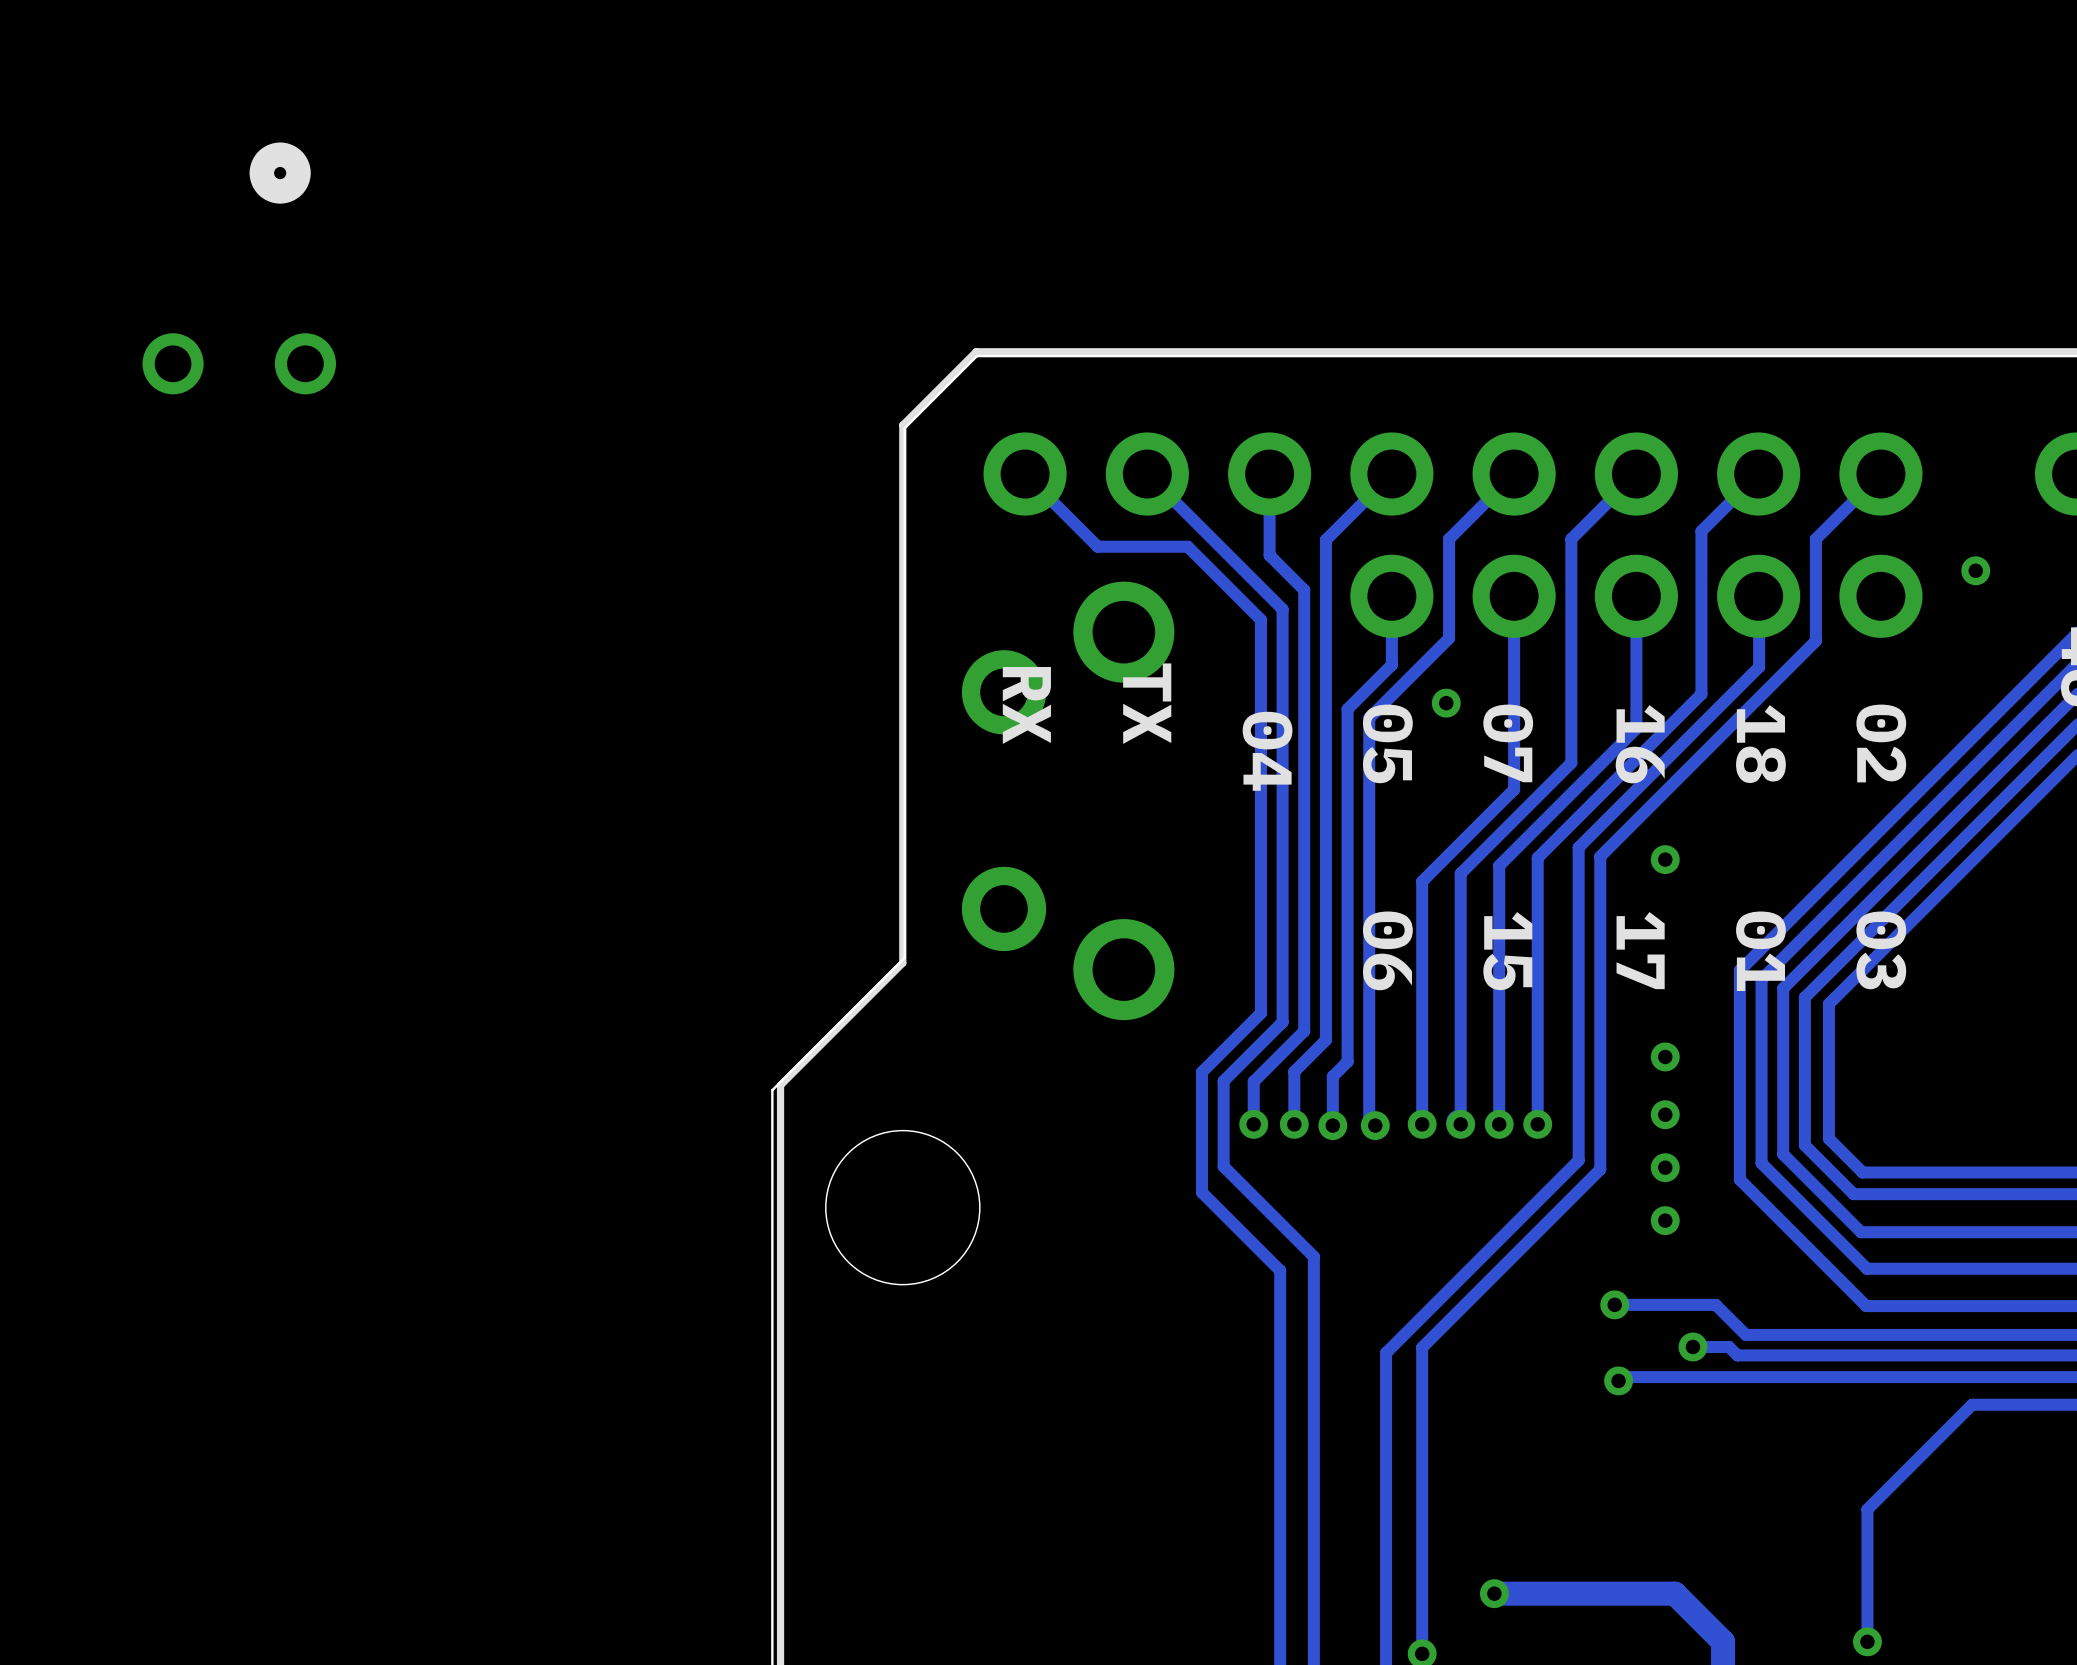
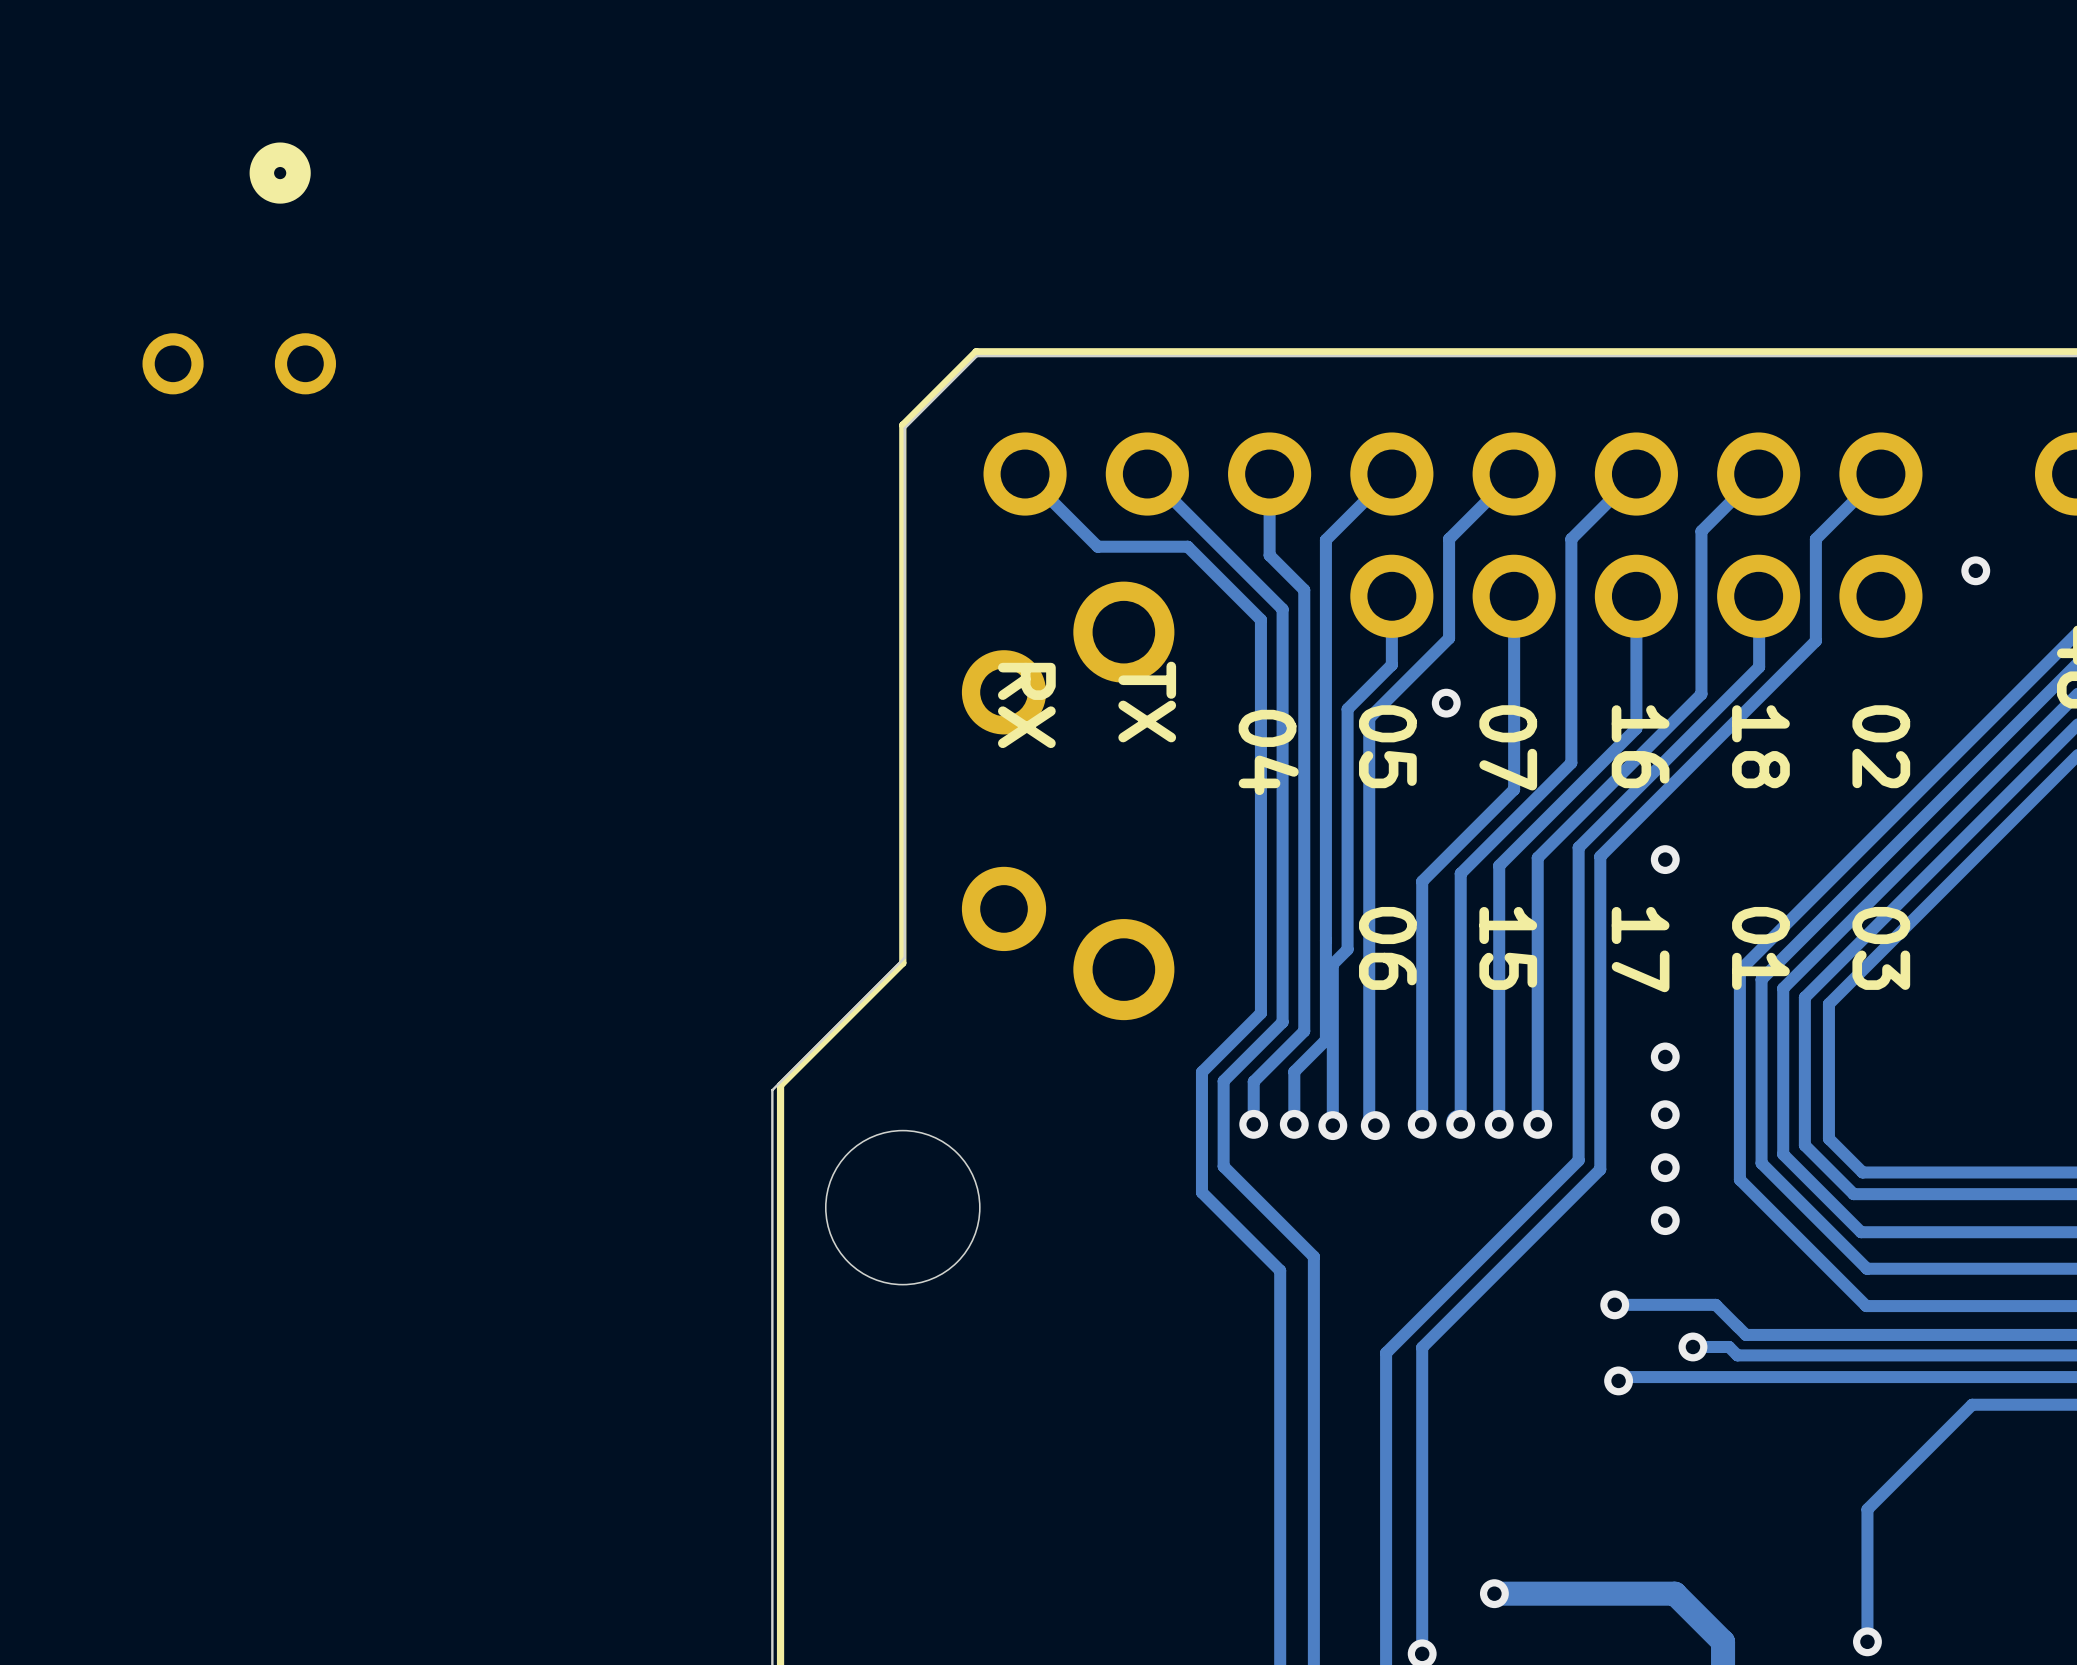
track: (1347, 949) (1347, 1061) (1332, 1076) -> (1347, 949) (1332, 964) (1332, 1076)

